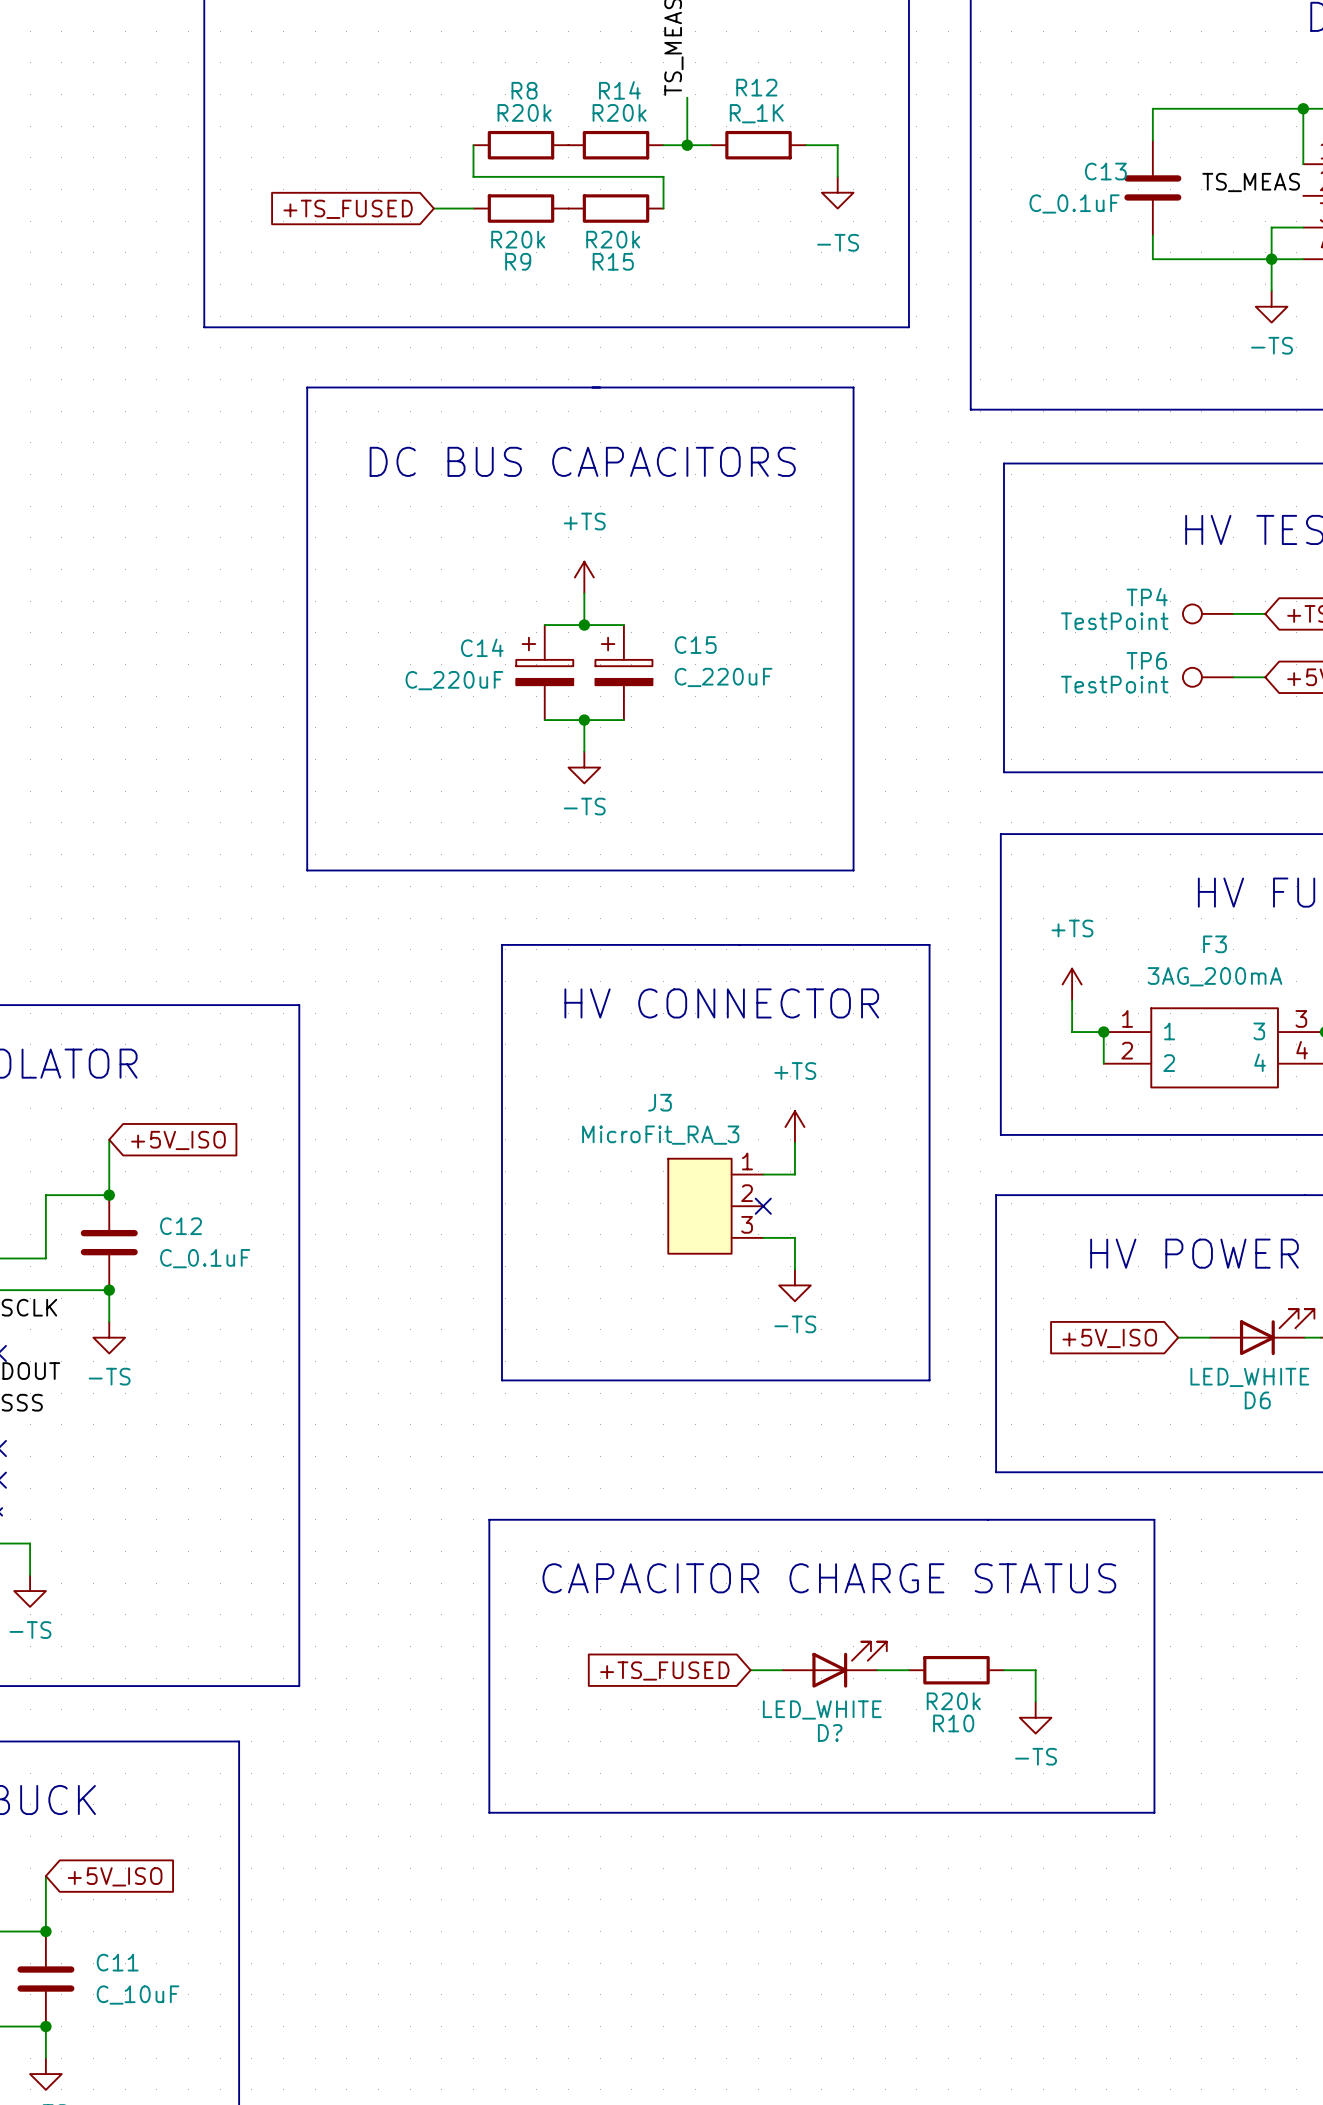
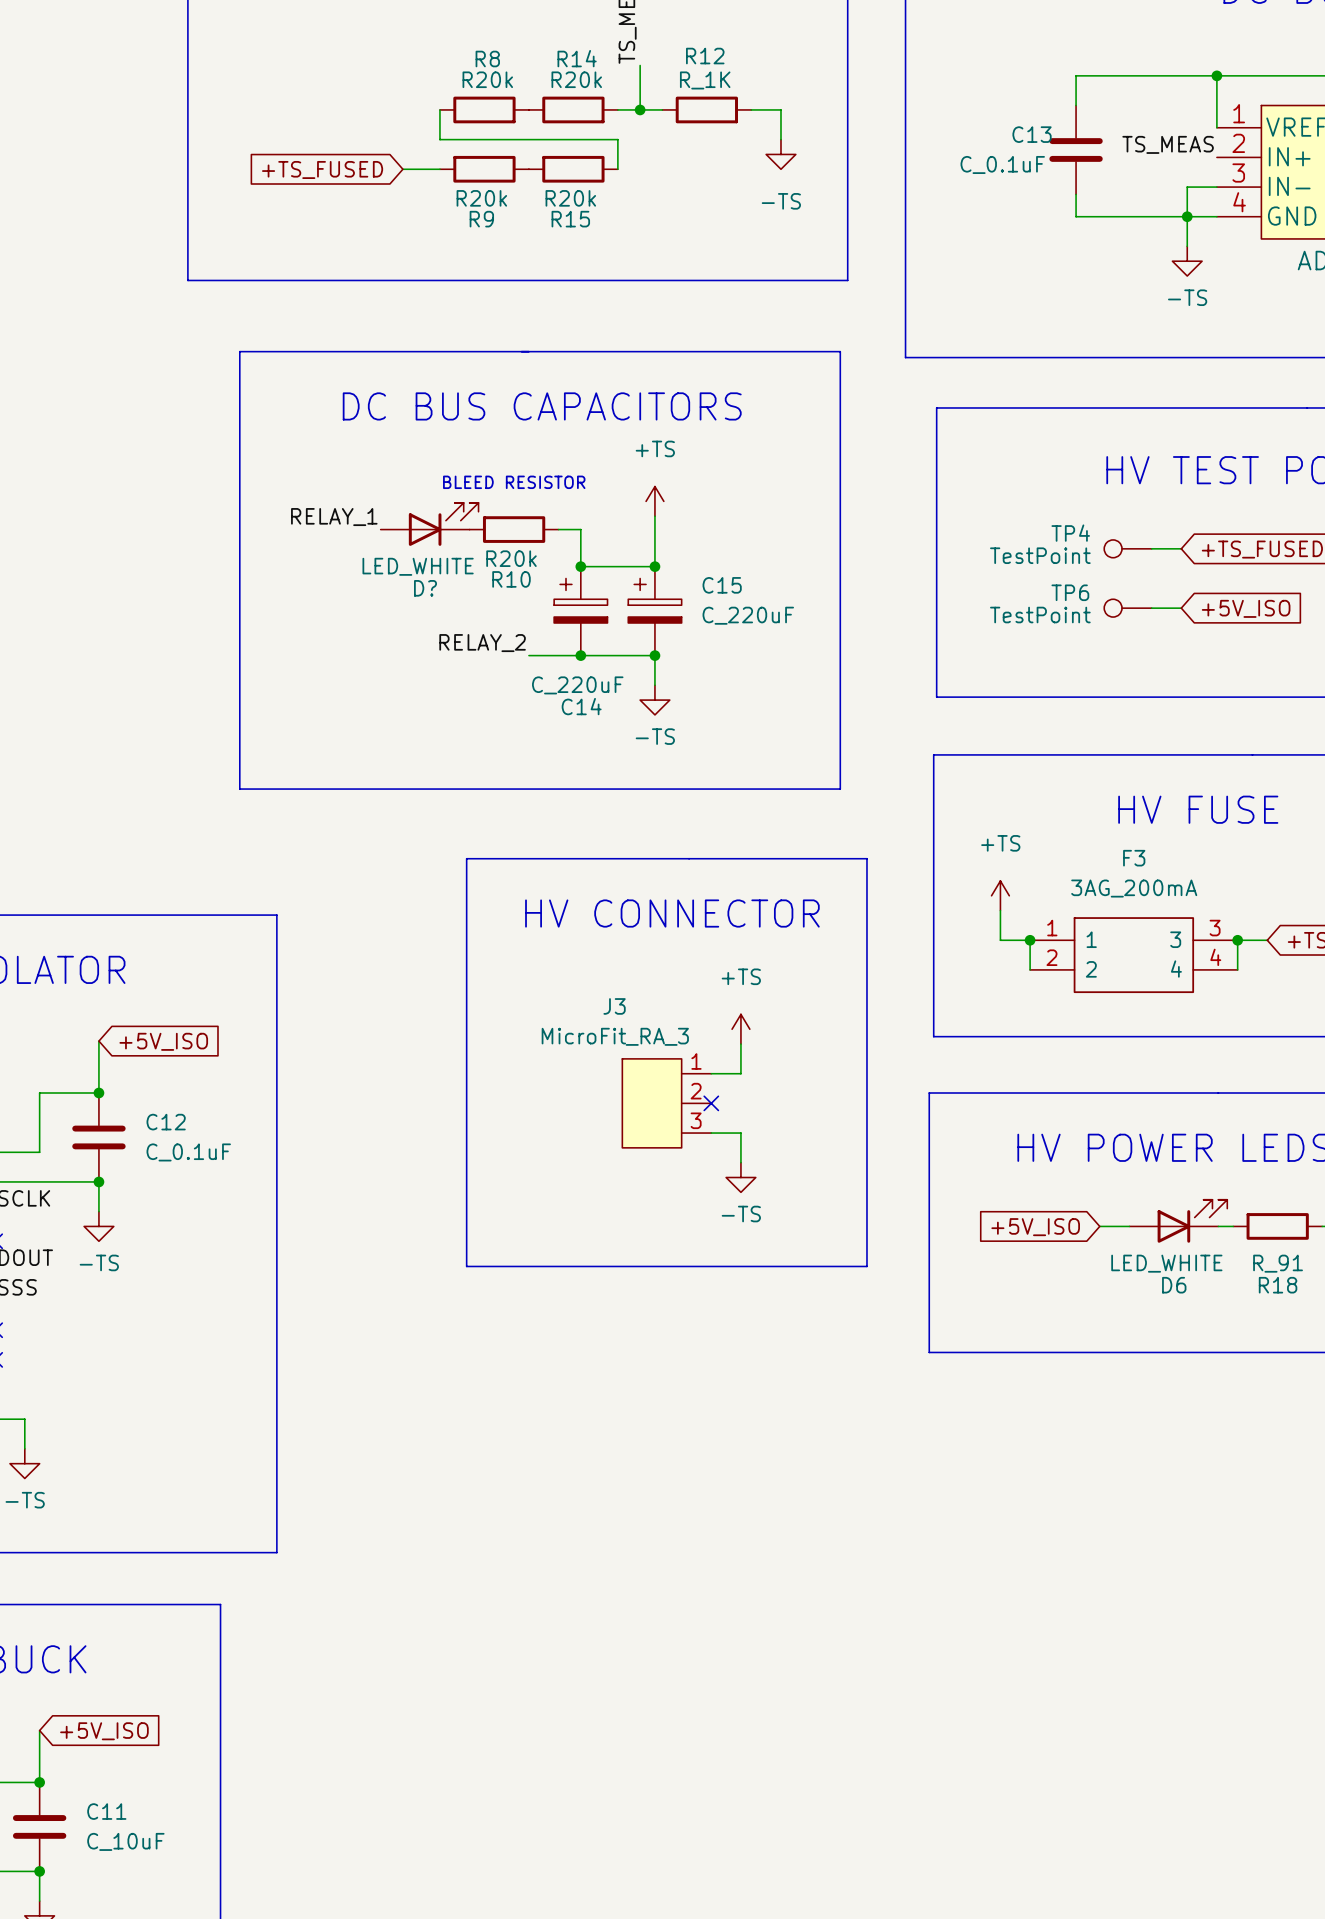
text: none -> BLEED RESISTOR (514, 482)
power symbol position: +TS (584, 577) -> +TS (654, 501)
label: none -> RELAY_1 (334, 517)
wire: none -> (654, 516) (654, 566) (580, 566) (580, 529) (558, 529)
D?: none -> LED_WHITE (429, 524)
wire: (584, 593) (584, 625) -> none
wire: (544, 625) (623, 625) -> none
junction position: (584, 625) -> (580, 566)
junction: none -> (654, 566)
C14 name position: C14 (482, 647) -> C14 (581, 706)
C14 position: (544, 672) -> (580, 611)
C15 position: (623, 672) -> (654, 611)
C14 value position: C_220uF (454, 680) -> C_220uF (577, 685)
label: none -> RELAY_2 (482, 643)
wire: (544, 720) (623, 720) -> none
wire: (584, 720) (584, 751) -> none
junction position: (584, 720) -> (580, 655)
wire: none -> (528, 655) (654, 655) (654, 685)
junction: none -> (654, 655)
power symbol position: -TS (584, 767) -> -TS (654, 700)
line: (307, 870) (307, 387) (853, 387) (853, 870) -> (284, 789) (239, 789) (239, 351) (840, 351) (840, 789) (795, 789)
line: (489, 1519) (489, 1812) (1154, 1812) (1154, 1519) (489, 1519) -> none
text: CAPACITOR CHARGE STATUS (829, 1578) -> none
D?: LED_WHITE (834, 1664) -> none
global label: +TS_FUSED (664, 1670) -> none
wire: (750, 1670) (782, 1670) -> none
wire: (877, 1670) (908, 1670) -> none
R10 position: (956, 1670) -> (514, 529)
wire: (1004, 1670) (1035, 1670) (1035, 1701) -> none
power symbol: -TS (1035, 1717) -> none

